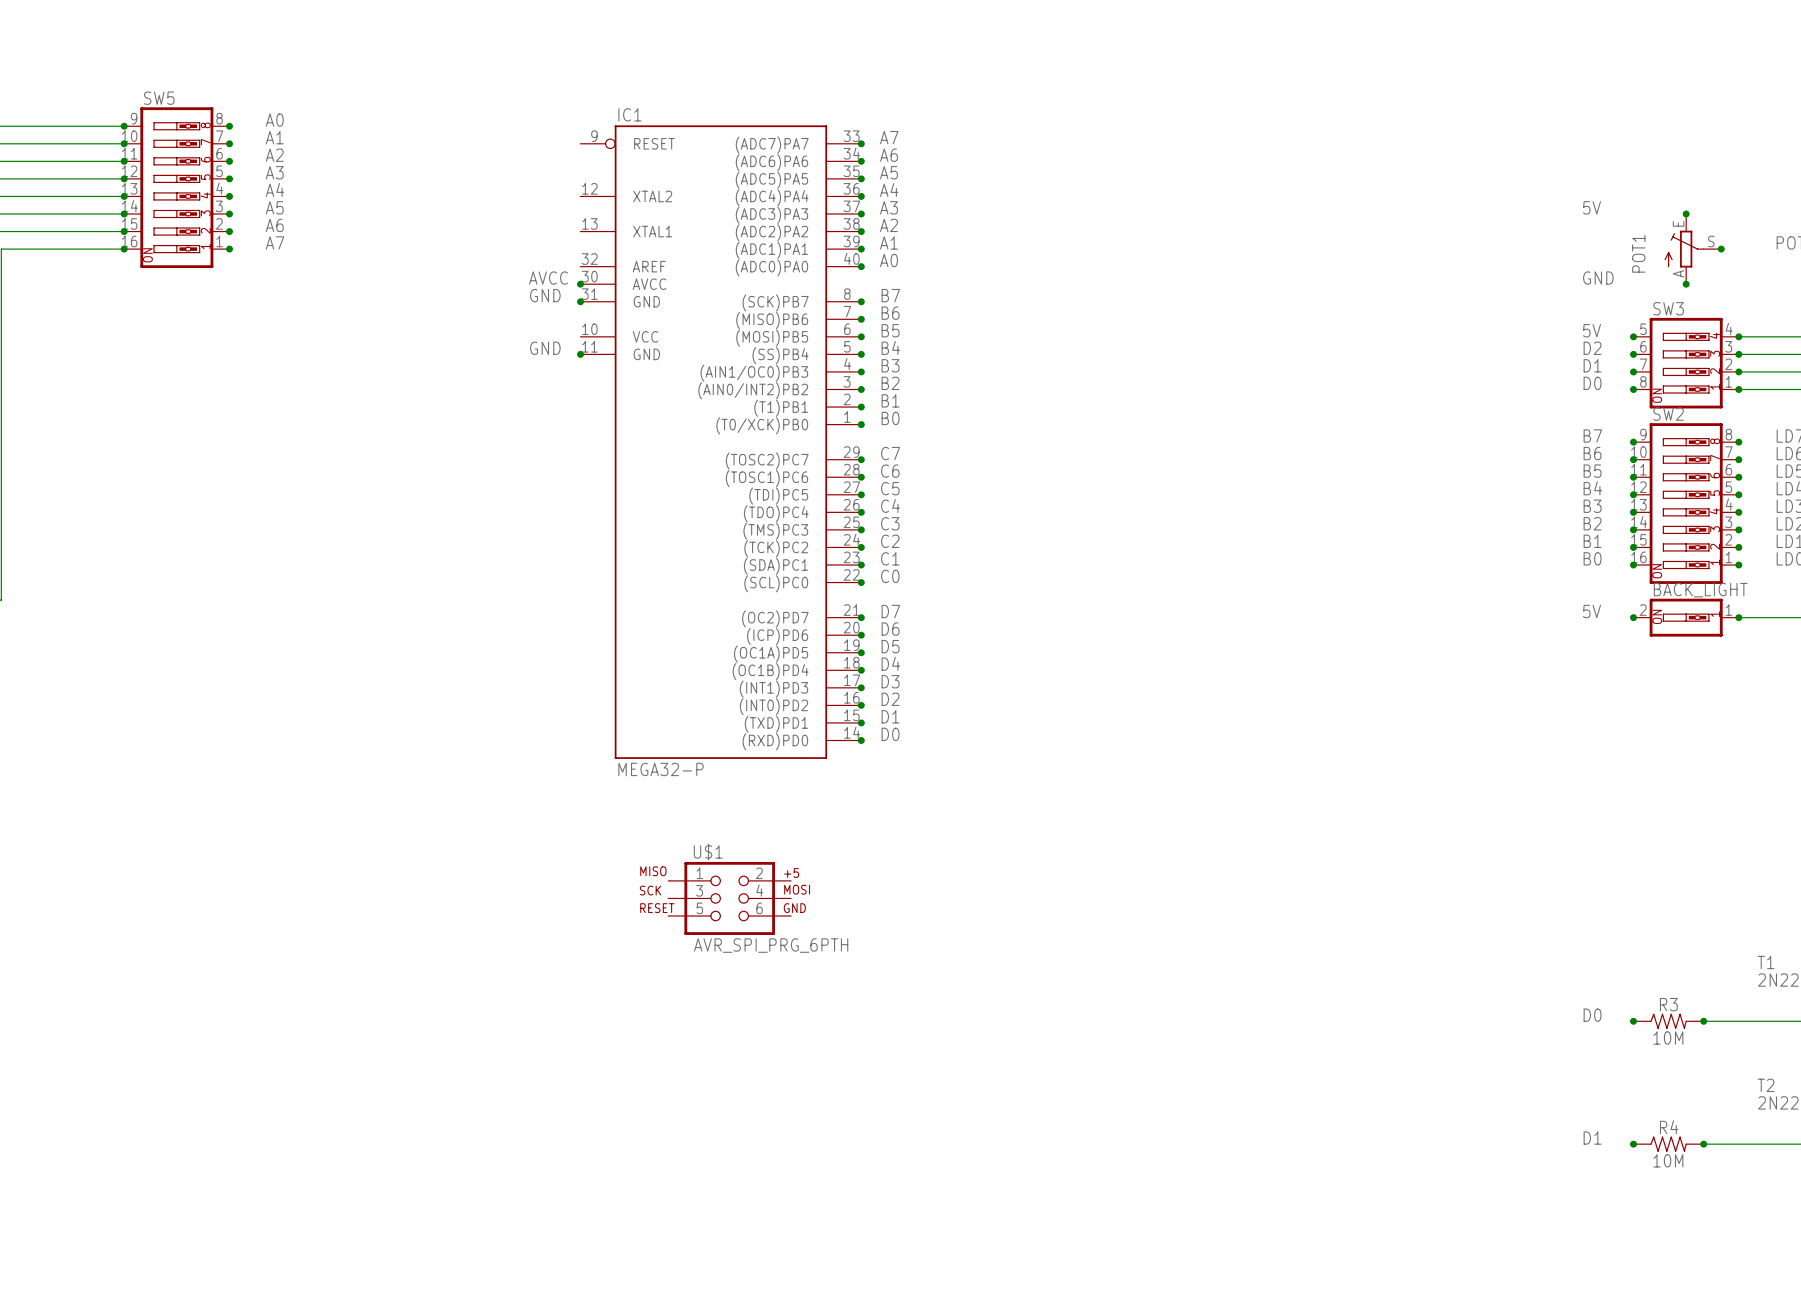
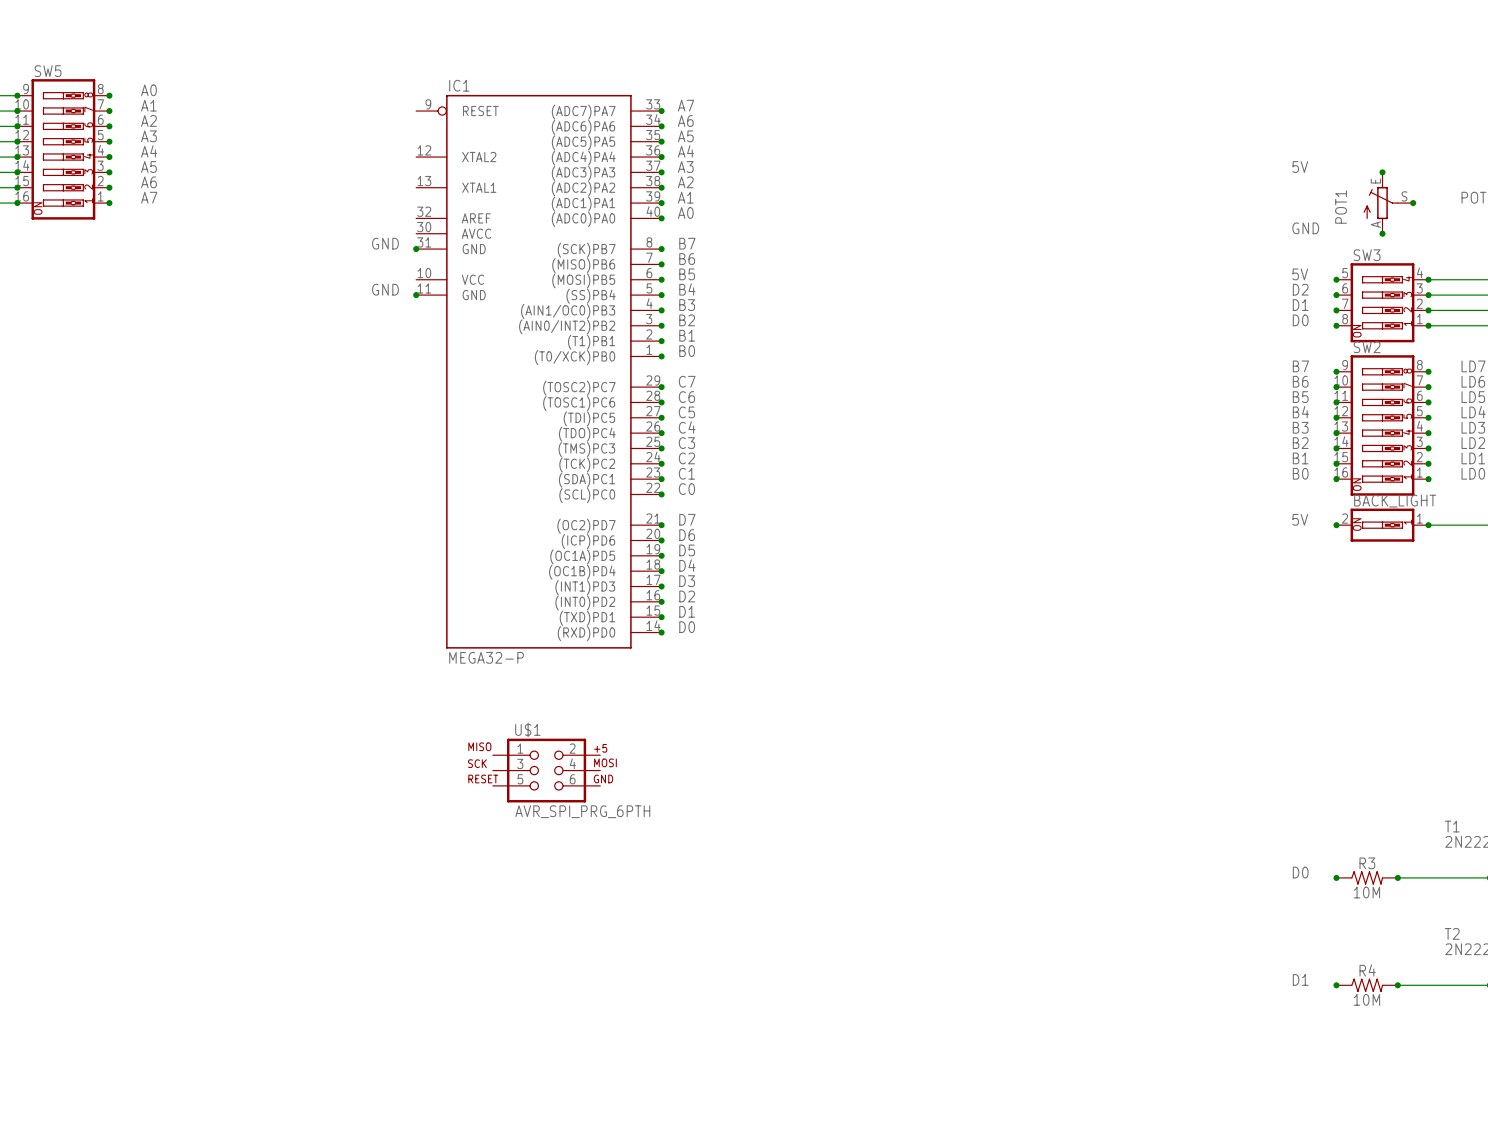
label: AVCC (548, 278) -> none
junction: (580, 284) -> none

